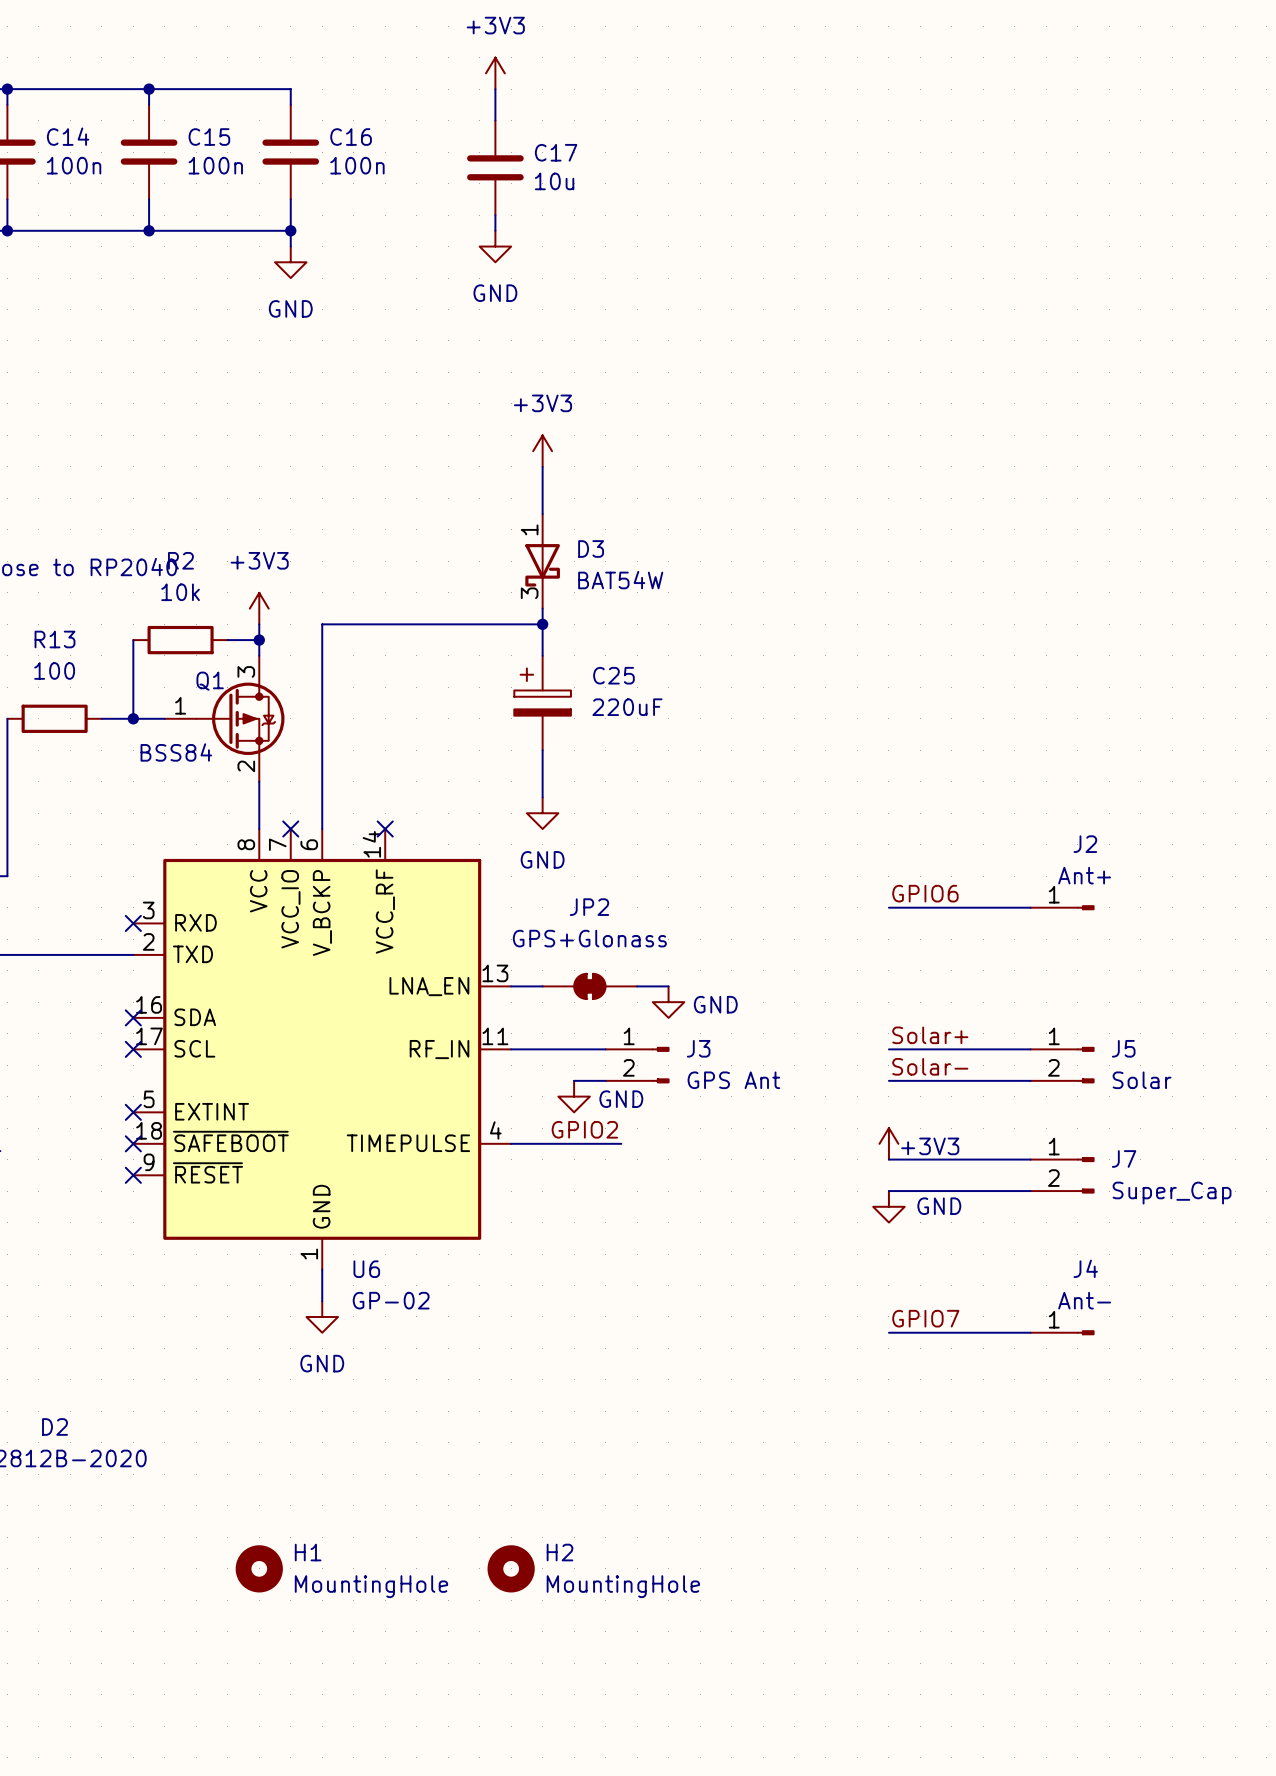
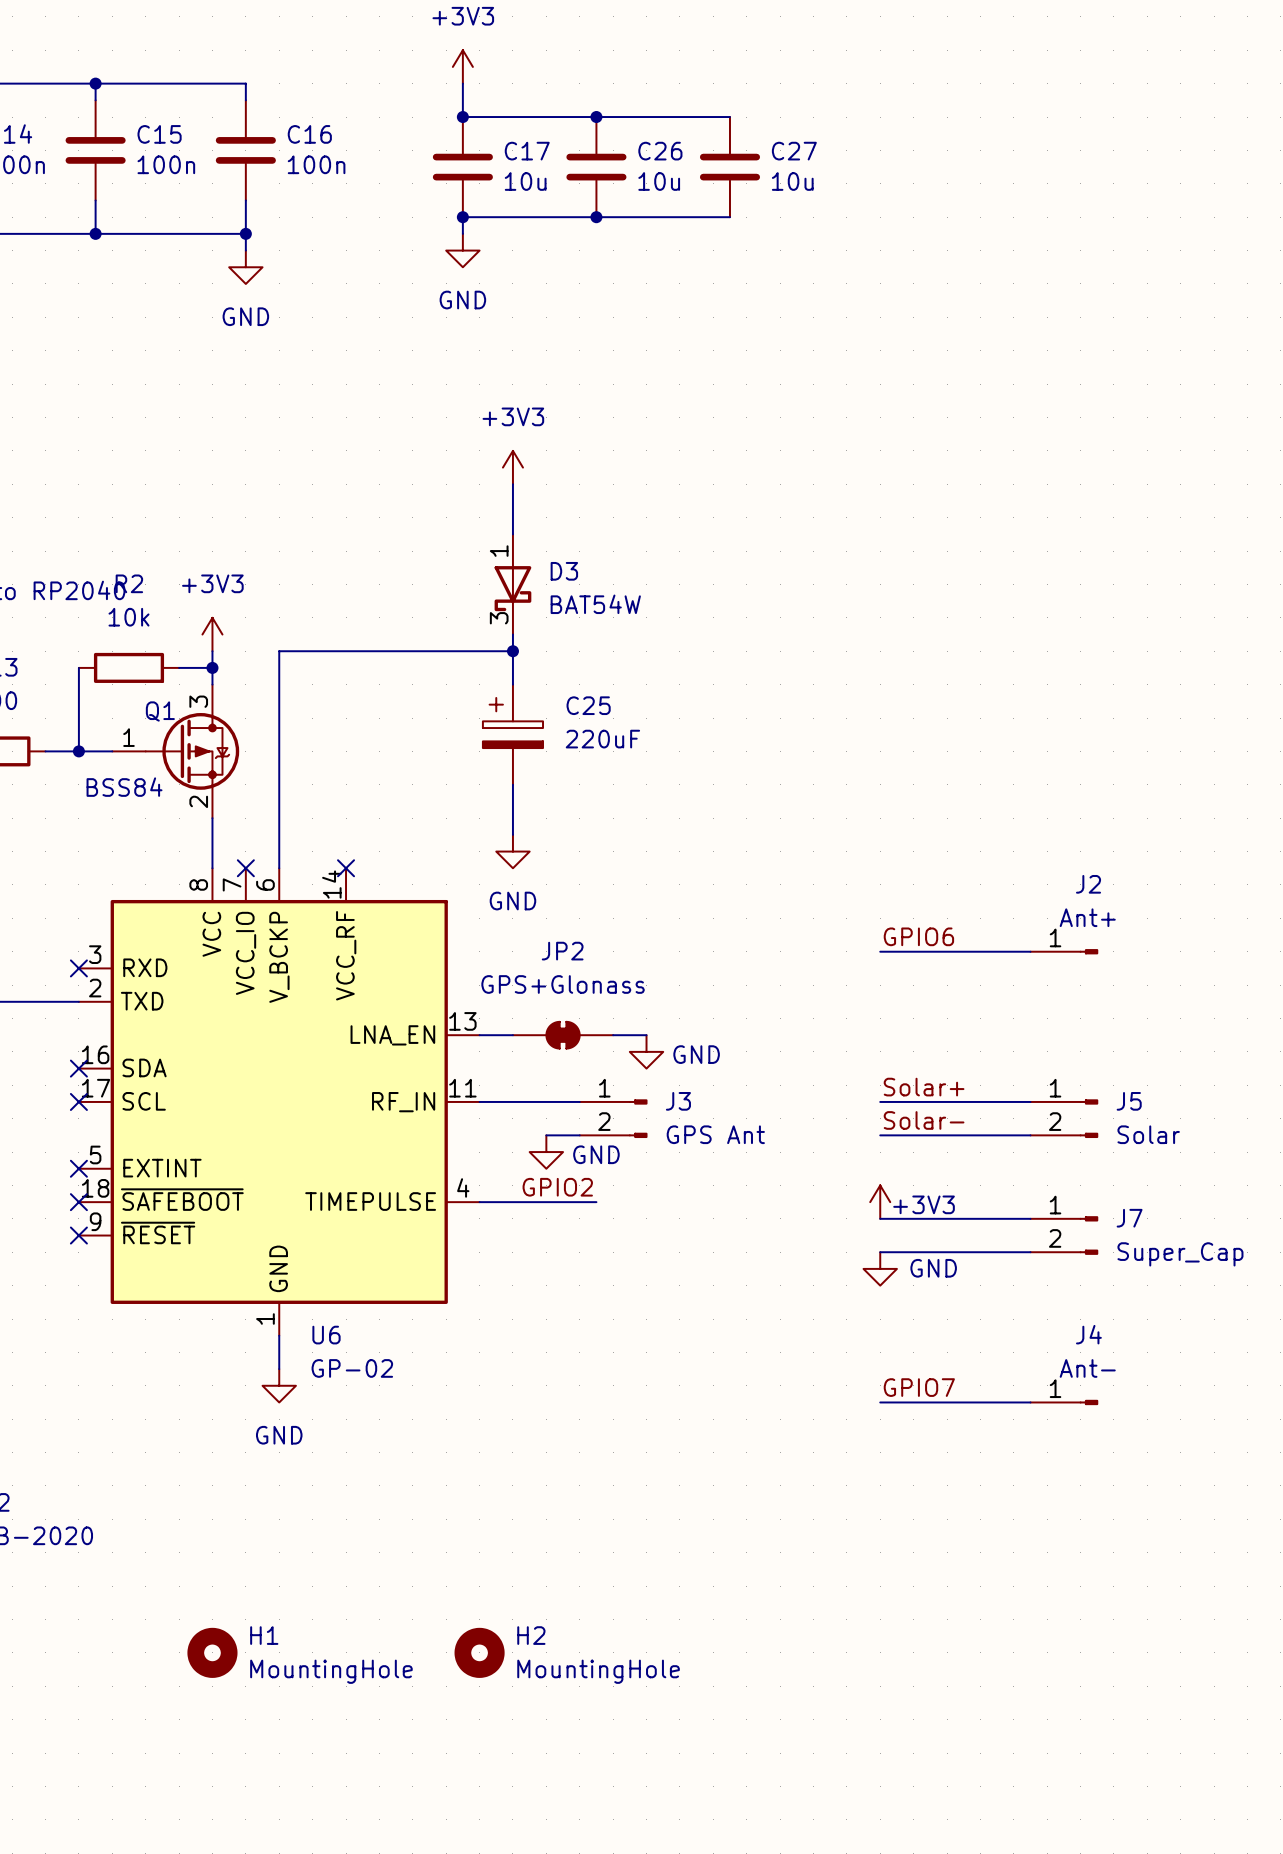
wire: none -> (462, 117) (729, 117)
junction: none -> (462, 117)
junction: none -> (596, 117)
C26: none -> 10u (596, 167)
C27: none -> 10u (729, 167)
wire: none -> (462, 217) (729, 217)
junction: none -> (462, 217)
junction: none -> (596, 217)

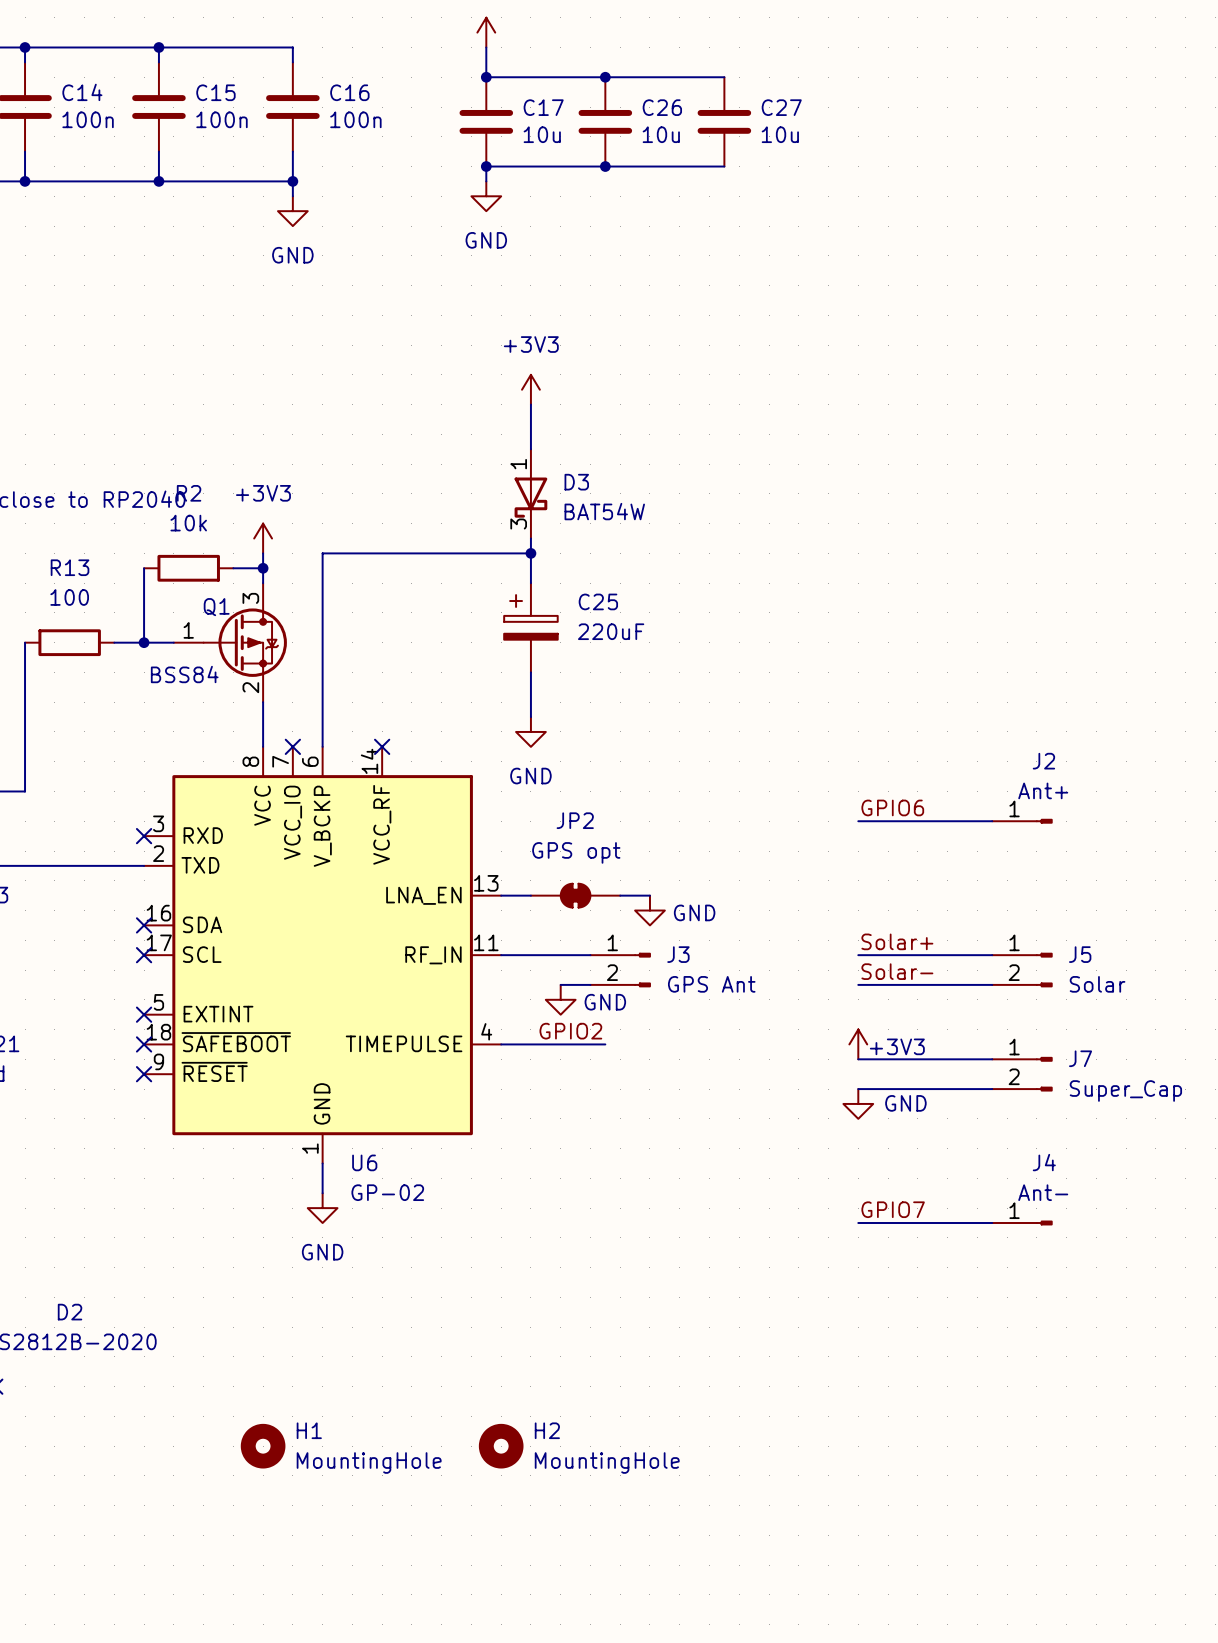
JP2 value: GPS+Glonass (563, 984) -> GPS opt (576, 852)

